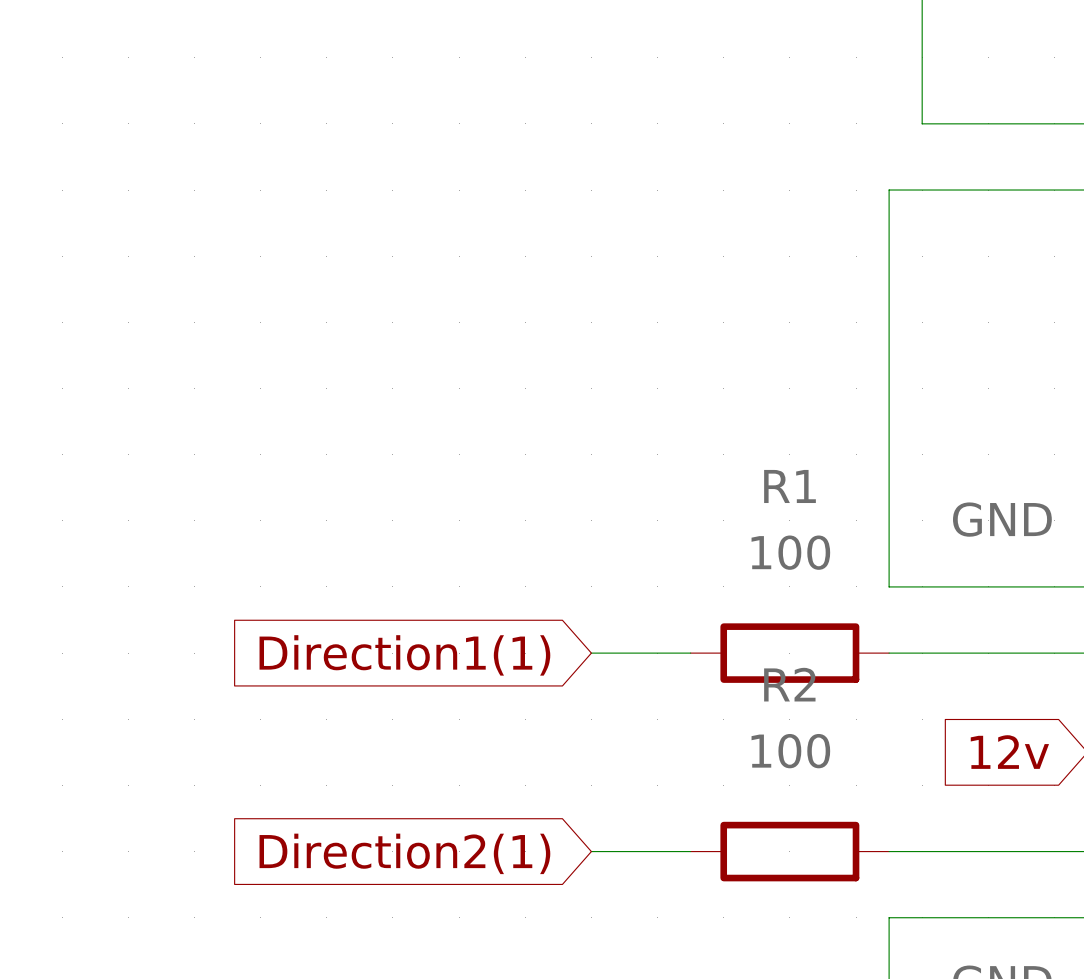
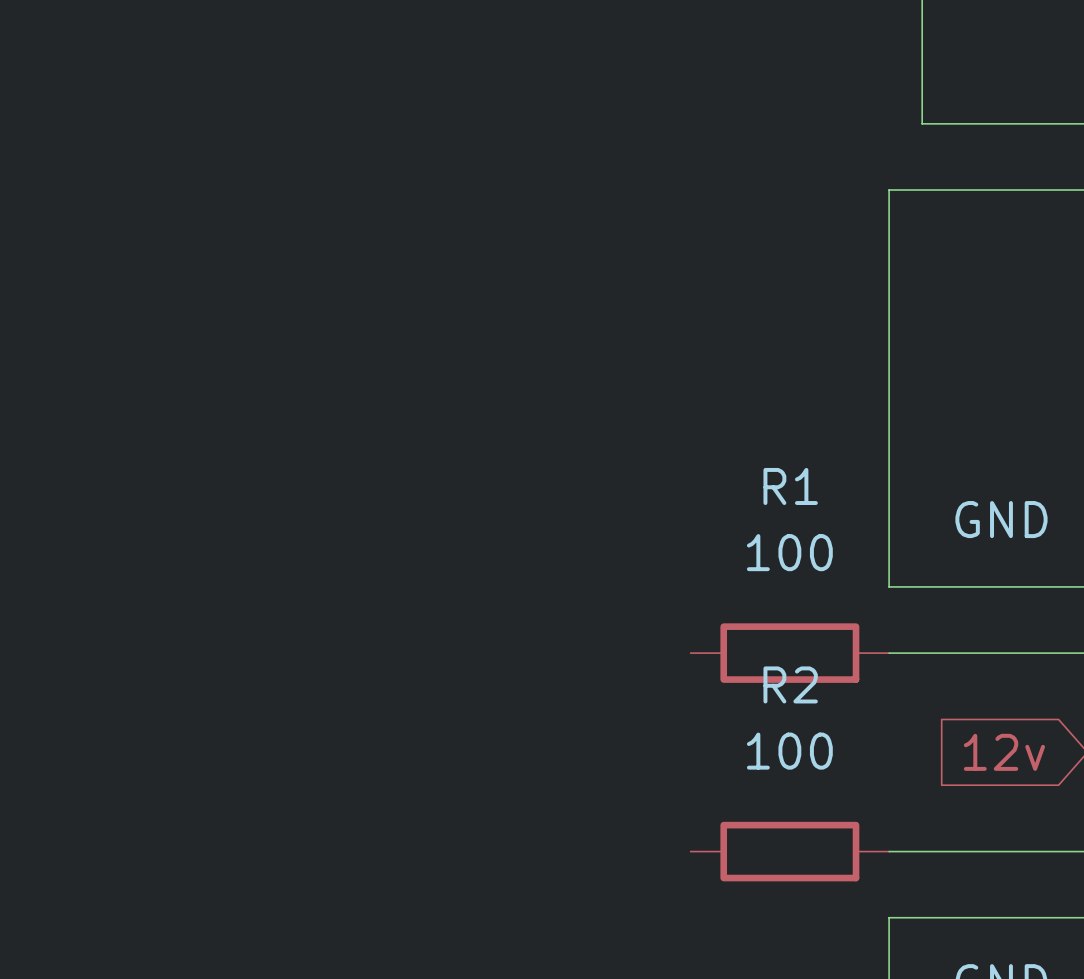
wire: (591, 653) (690, 653) -> none
global label: Direction1(1) (404, 655) -> none
wire: (591, 851) (690, 851) -> none
global label: Direction2(1) (404, 853) -> none

